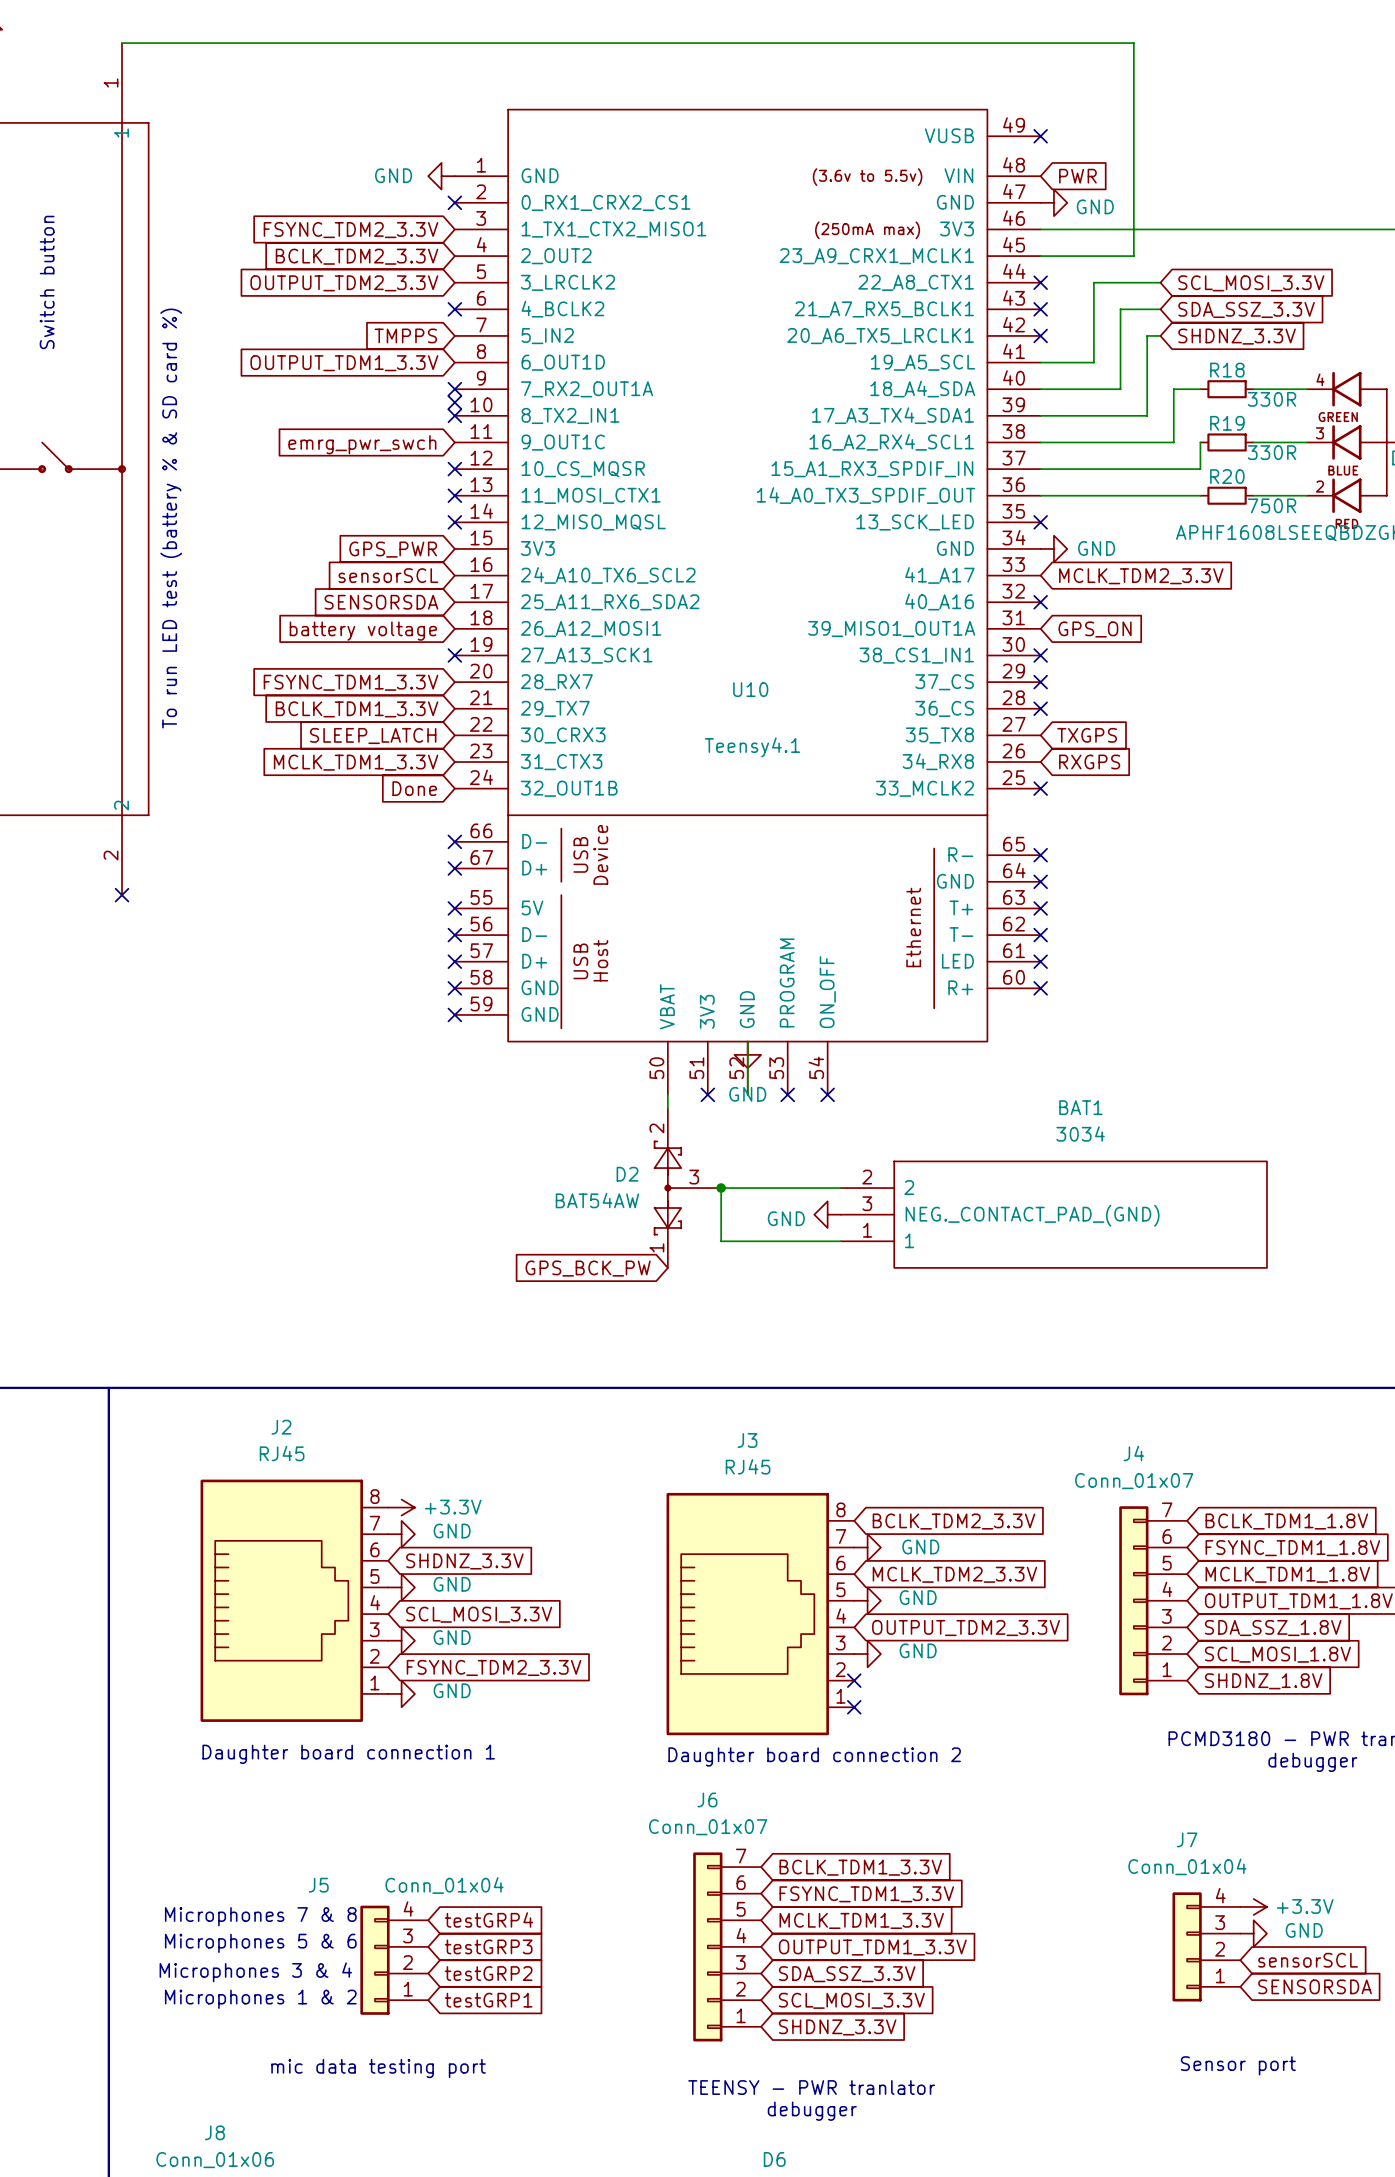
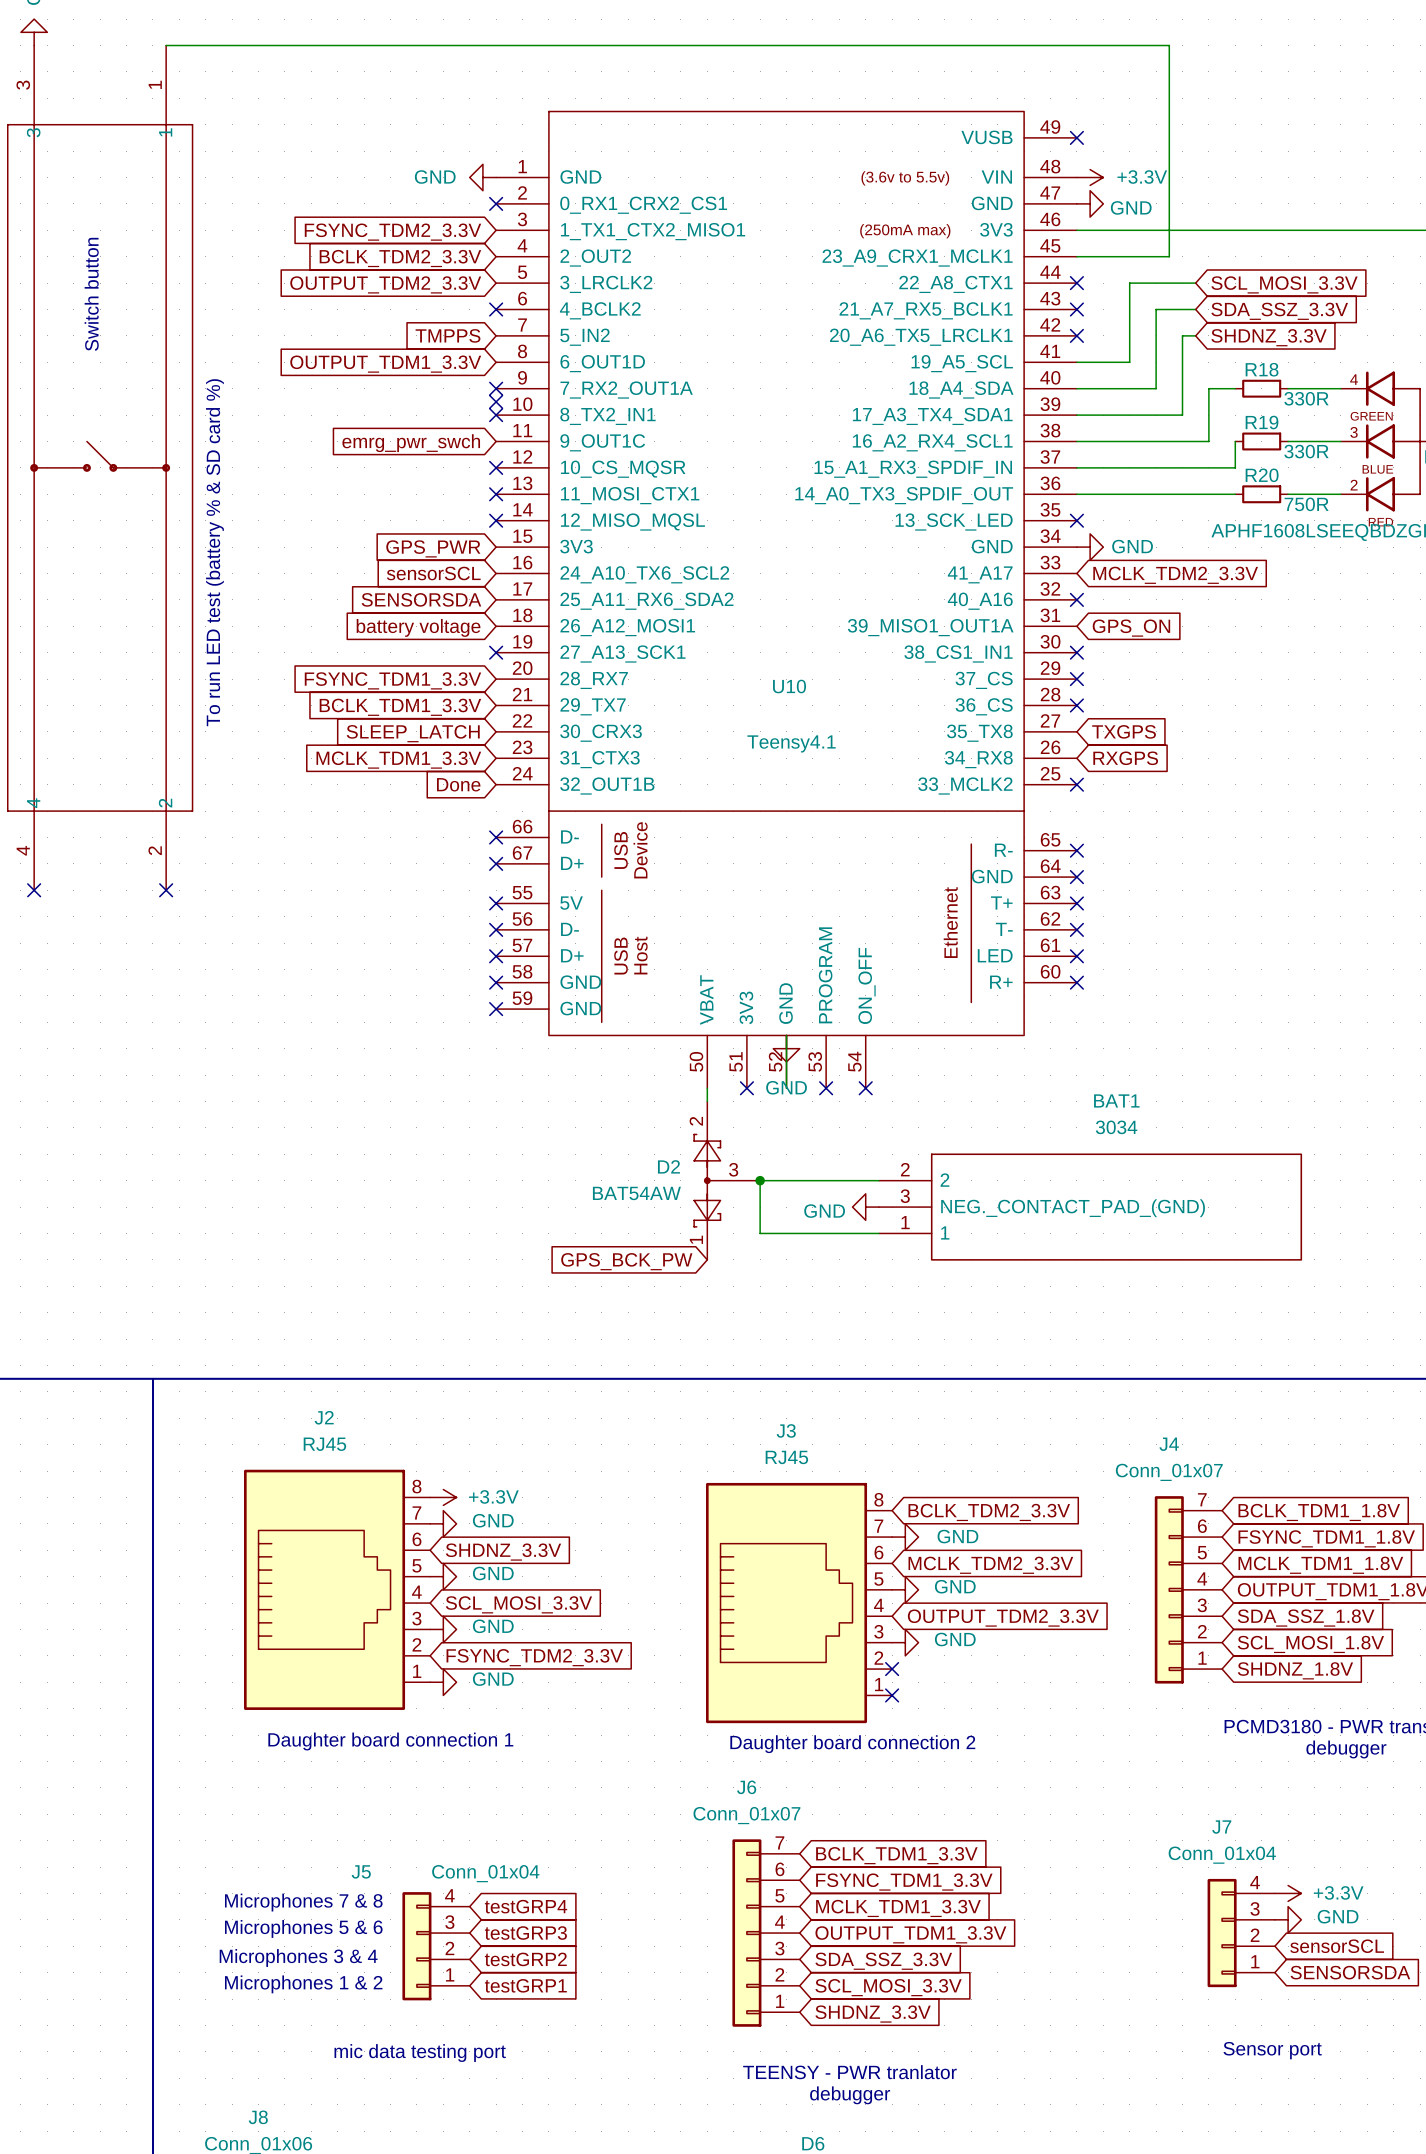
power symbol: none -> +3.3V (1090, 177)
global label: PWR (1077, 176) -> none

